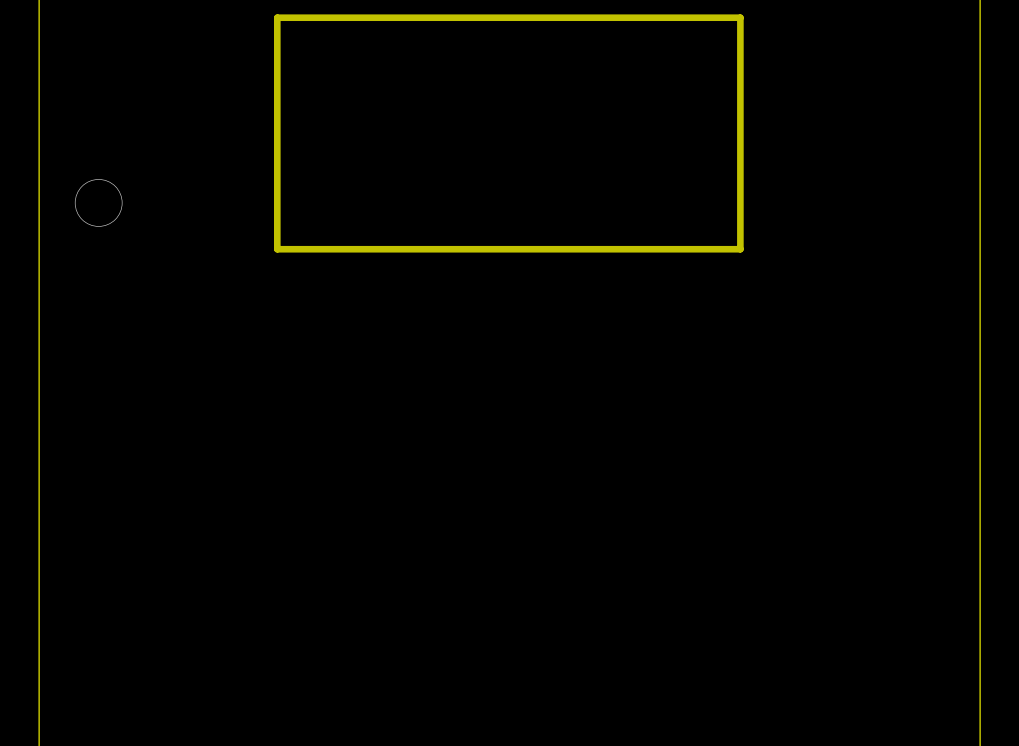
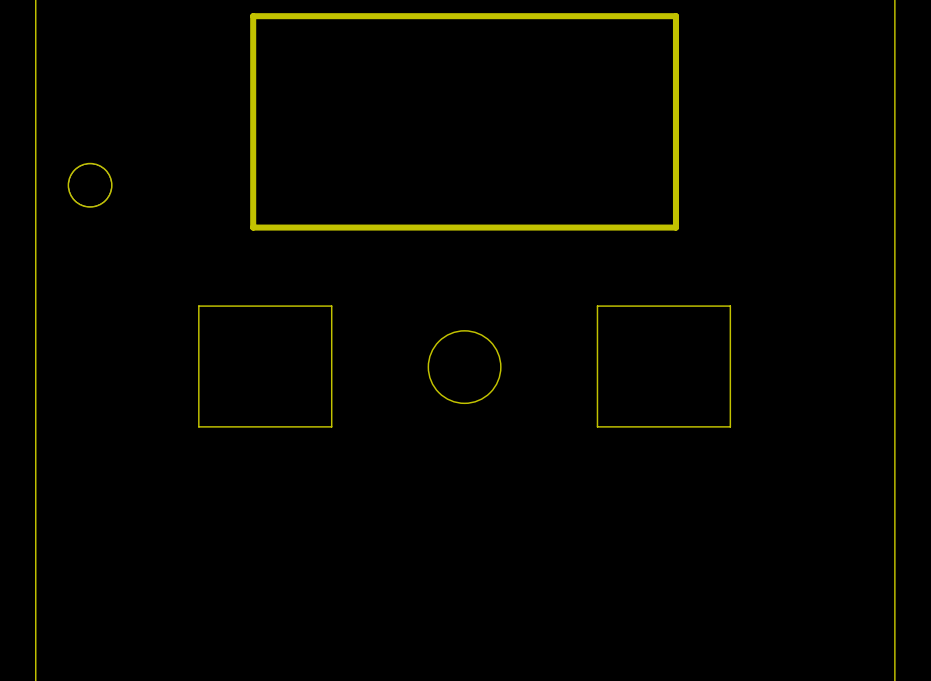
round board edge: none -> [68, 163, 113, 208]
board edge: none -> (198, 306) (331, 306) (331, 426) (198, 426) (198, 306)
board edge: none -> (597, 306) (730, 306) (730, 426) (597, 426) (597, 306)
round board edge: none -> [428, 330, 502, 404]

